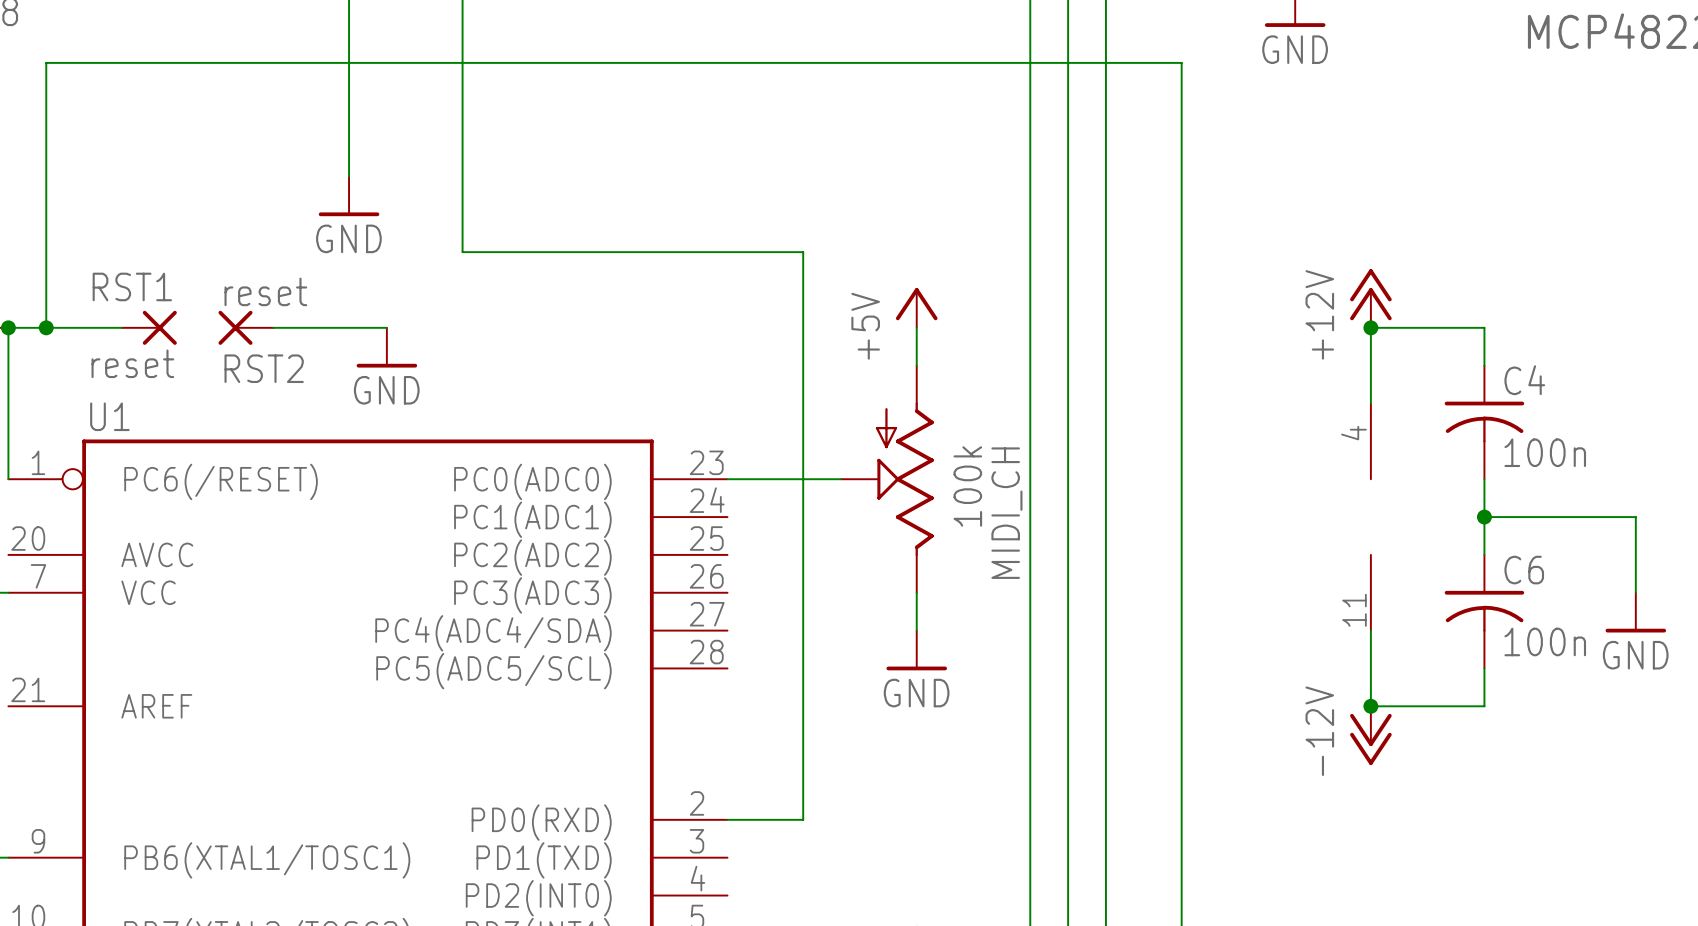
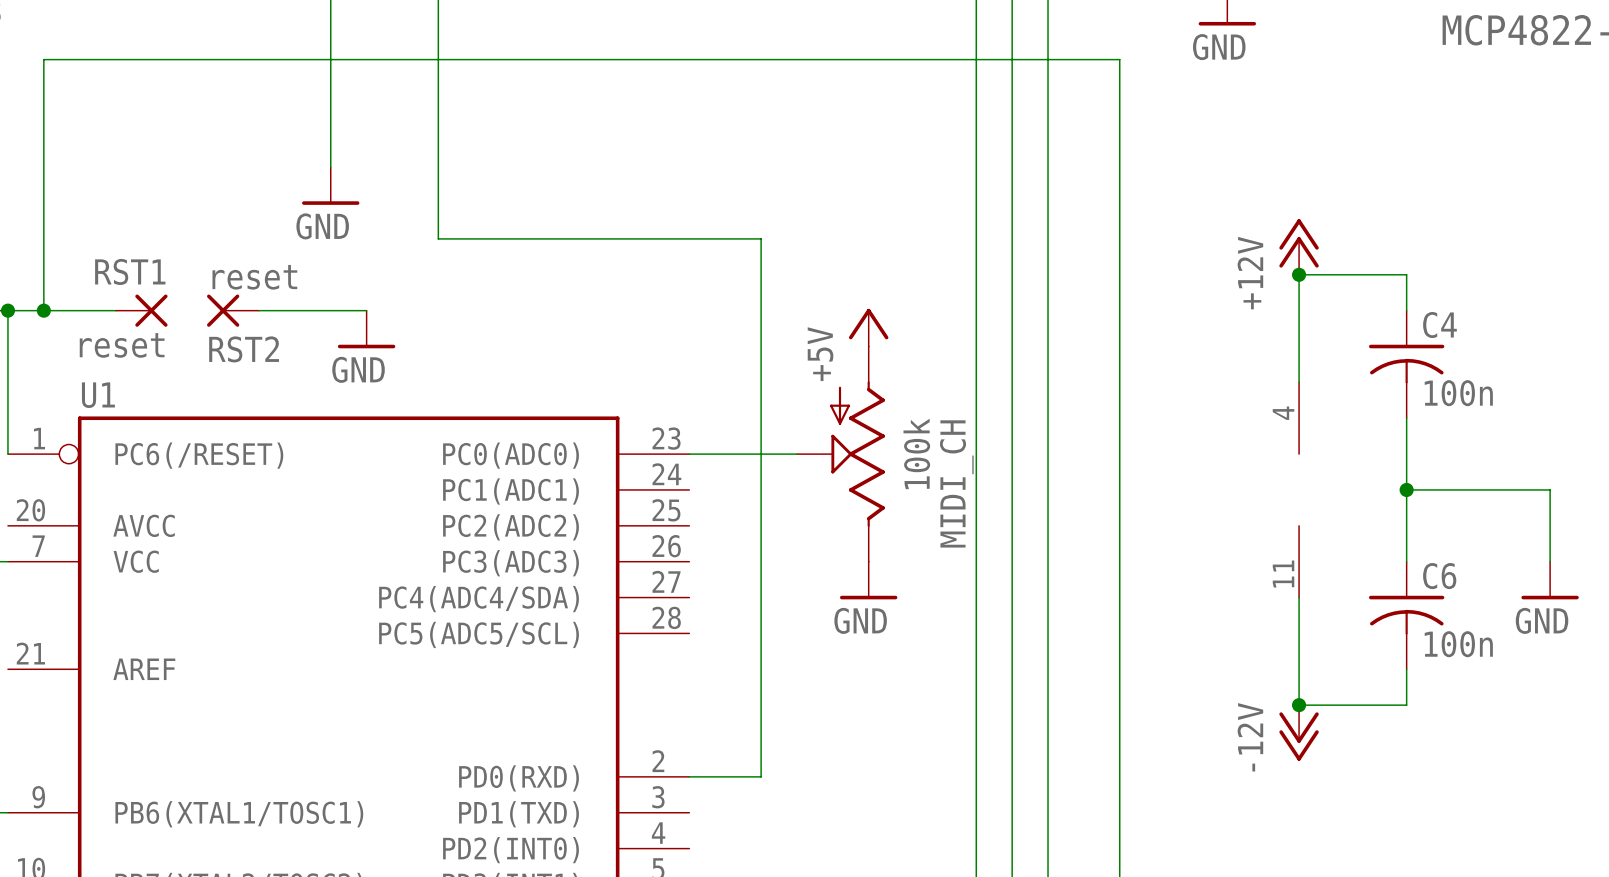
power symbol position: +12V (1370, 298) -> +12V (1299, 247)
power symbol position: +5V (916, 307) -> +5V (868, 327)
wire: (1370, 327) (1484, 327) (1484, 365) -> (1299, 310) (1299, 274) (1406, 274) (1406, 310)
junction position: (1370, 327) -> (1299, 274)
C4 position: (1484, 422) -> (1406, 364)
C6 position: (1484, 611) -> (1406, 615)
power symbol position: GND (916, 650) -> GND (868, 580)
wire: (1484, 668) (1484, 706) (1370, 706) -> (1406, 669) (1406, 705) (1299, 705) (1299, 669)
junction position: (1370, 706) -> (1299, 705)
power symbol position: -12V (1370, 735) -> -12V (1299, 732)

